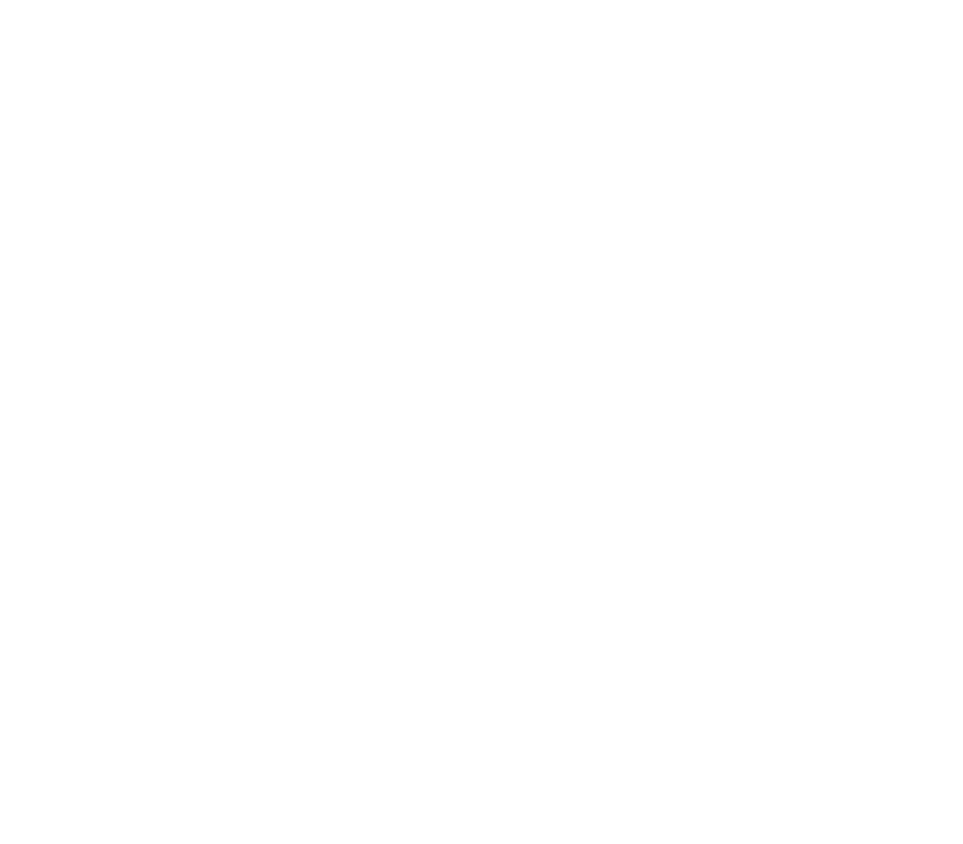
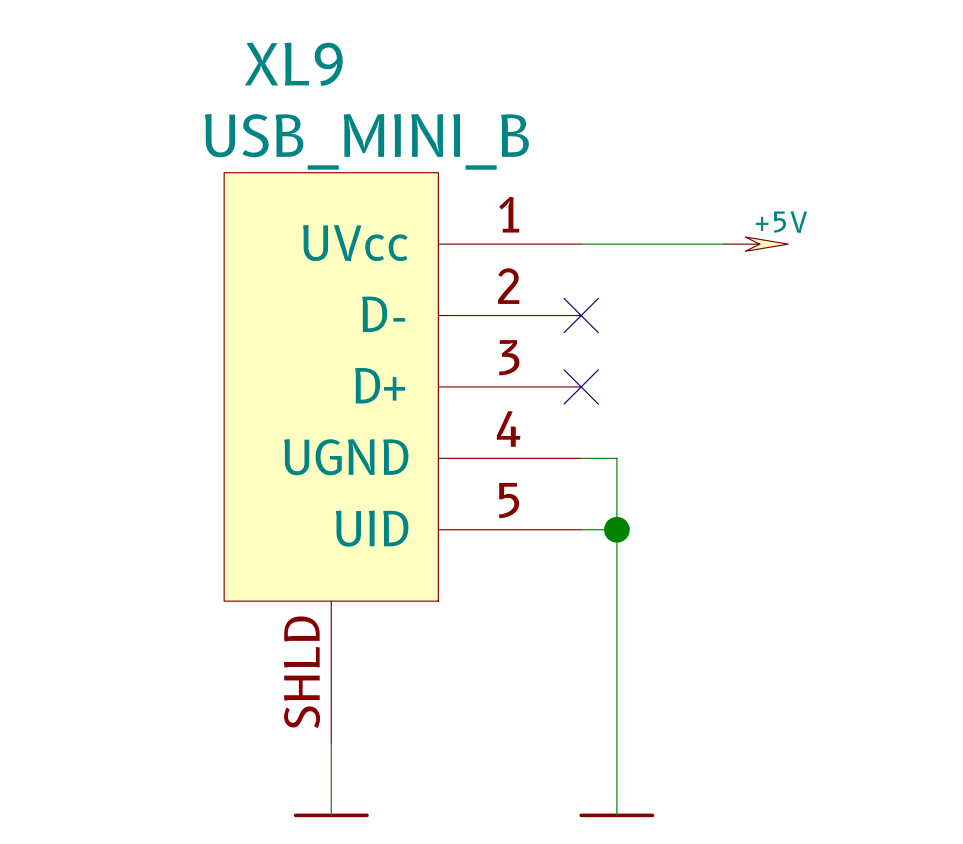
wire: none -> (581, 244) (724, 244)
power symbol: none -> +5V (756, 244)
no-connect mark: none -> (581, 315)
no-connect mark: none -> (581, 386)
XL9: none -> USB_MINI_B (402, 458)
wire: none -> (581, 458) (616, 458) (616, 815)
wire: none -> (581, 529) (616, 529)
junction: none -> (616, 529)
wire: none -> (331, 743) (331, 815)
power symbol: none -> (331, 815)
power symbol: none -> (616, 815)

